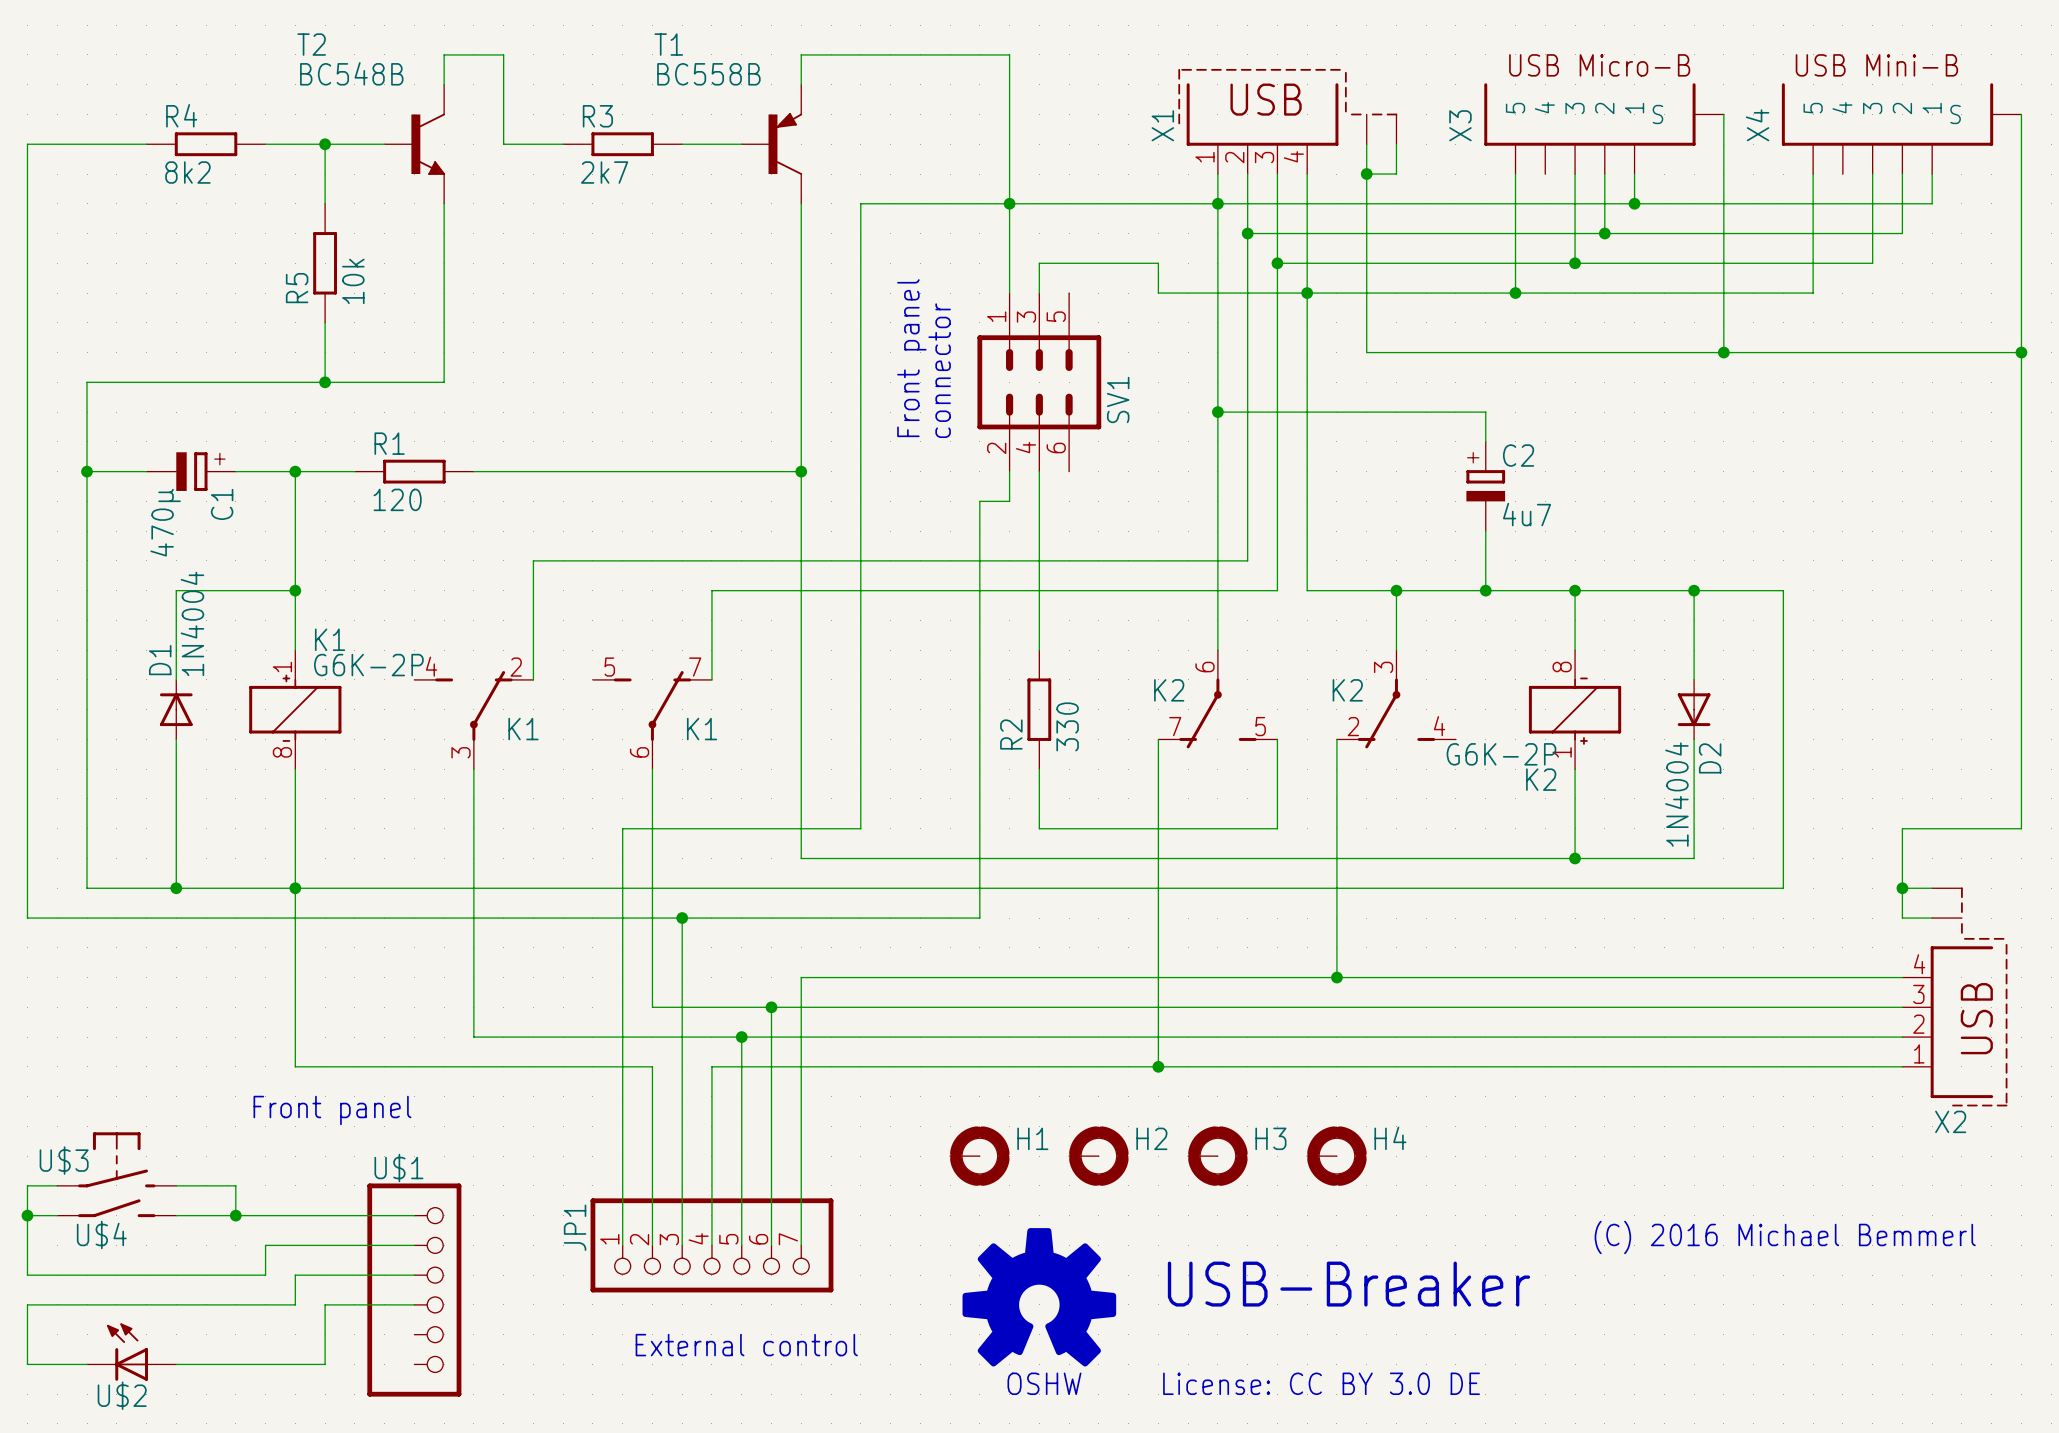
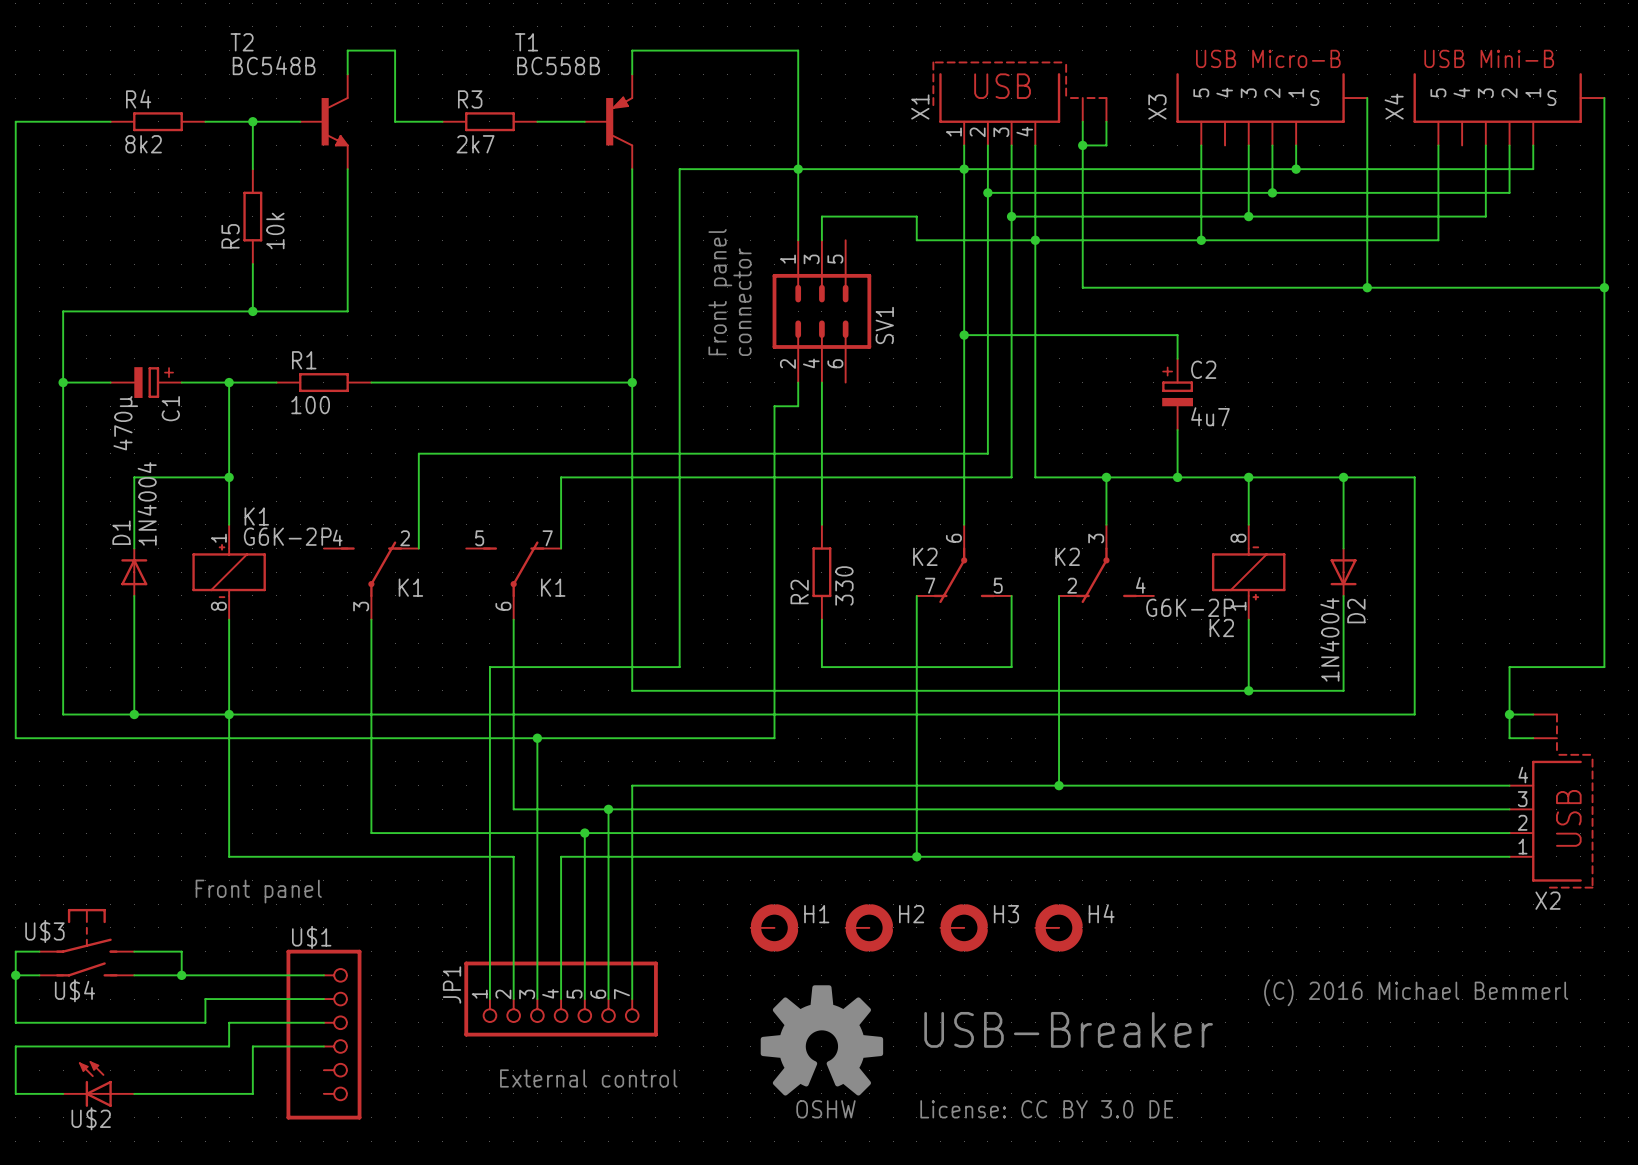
R1 value: 120 (397, 499) -> 100 (310, 405)

